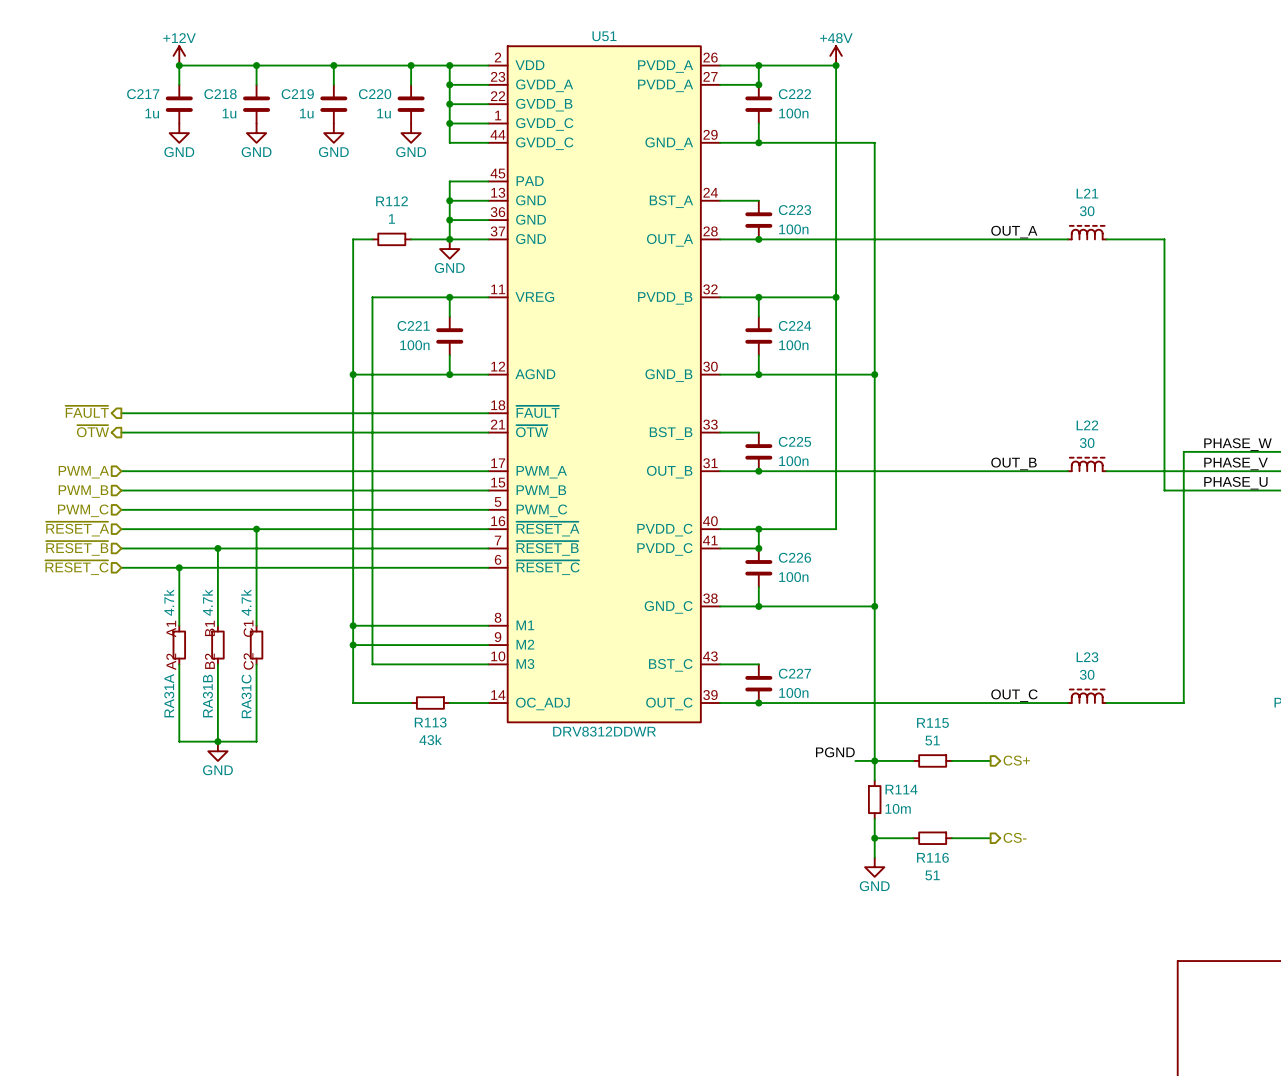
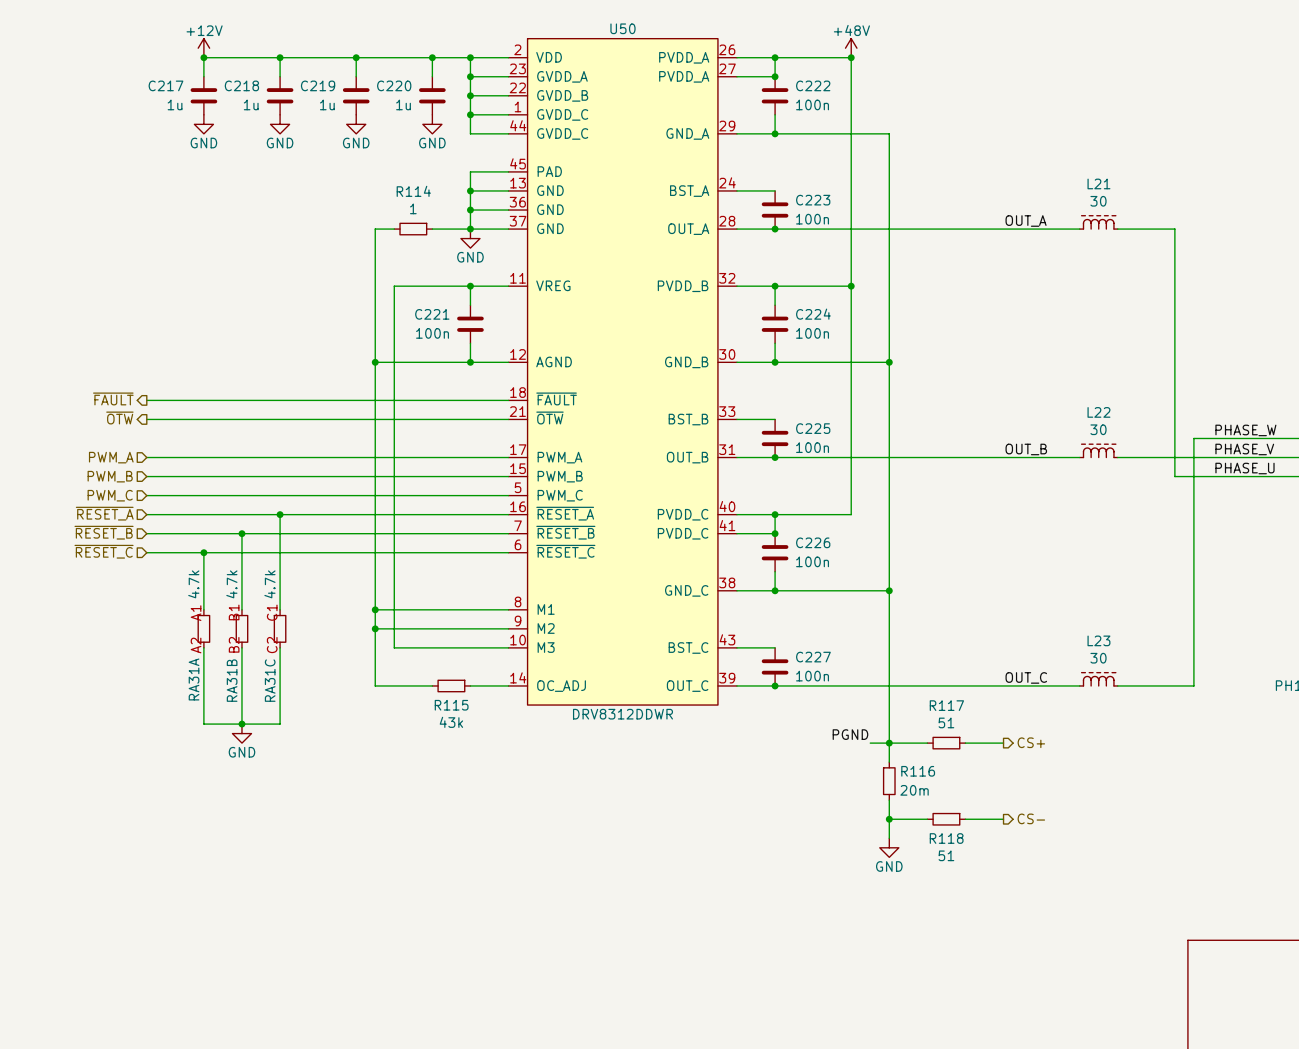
U51 name: U51 (604, 36) -> U50 (622, 28)
R112 name: R112 (392, 201) -> R114 (413, 191)
R113 name: R113 (430, 722) -> R115 (451, 705)
R115 name: R115 (932, 723) -> R117 (946, 705)
R114 name: R114 (901, 789) -> R116 (918, 771)
R114 value: 10m (898, 808) -> 20m (914, 790)
R116 name: R116 (932, 857) -> R118 (946, 838)

